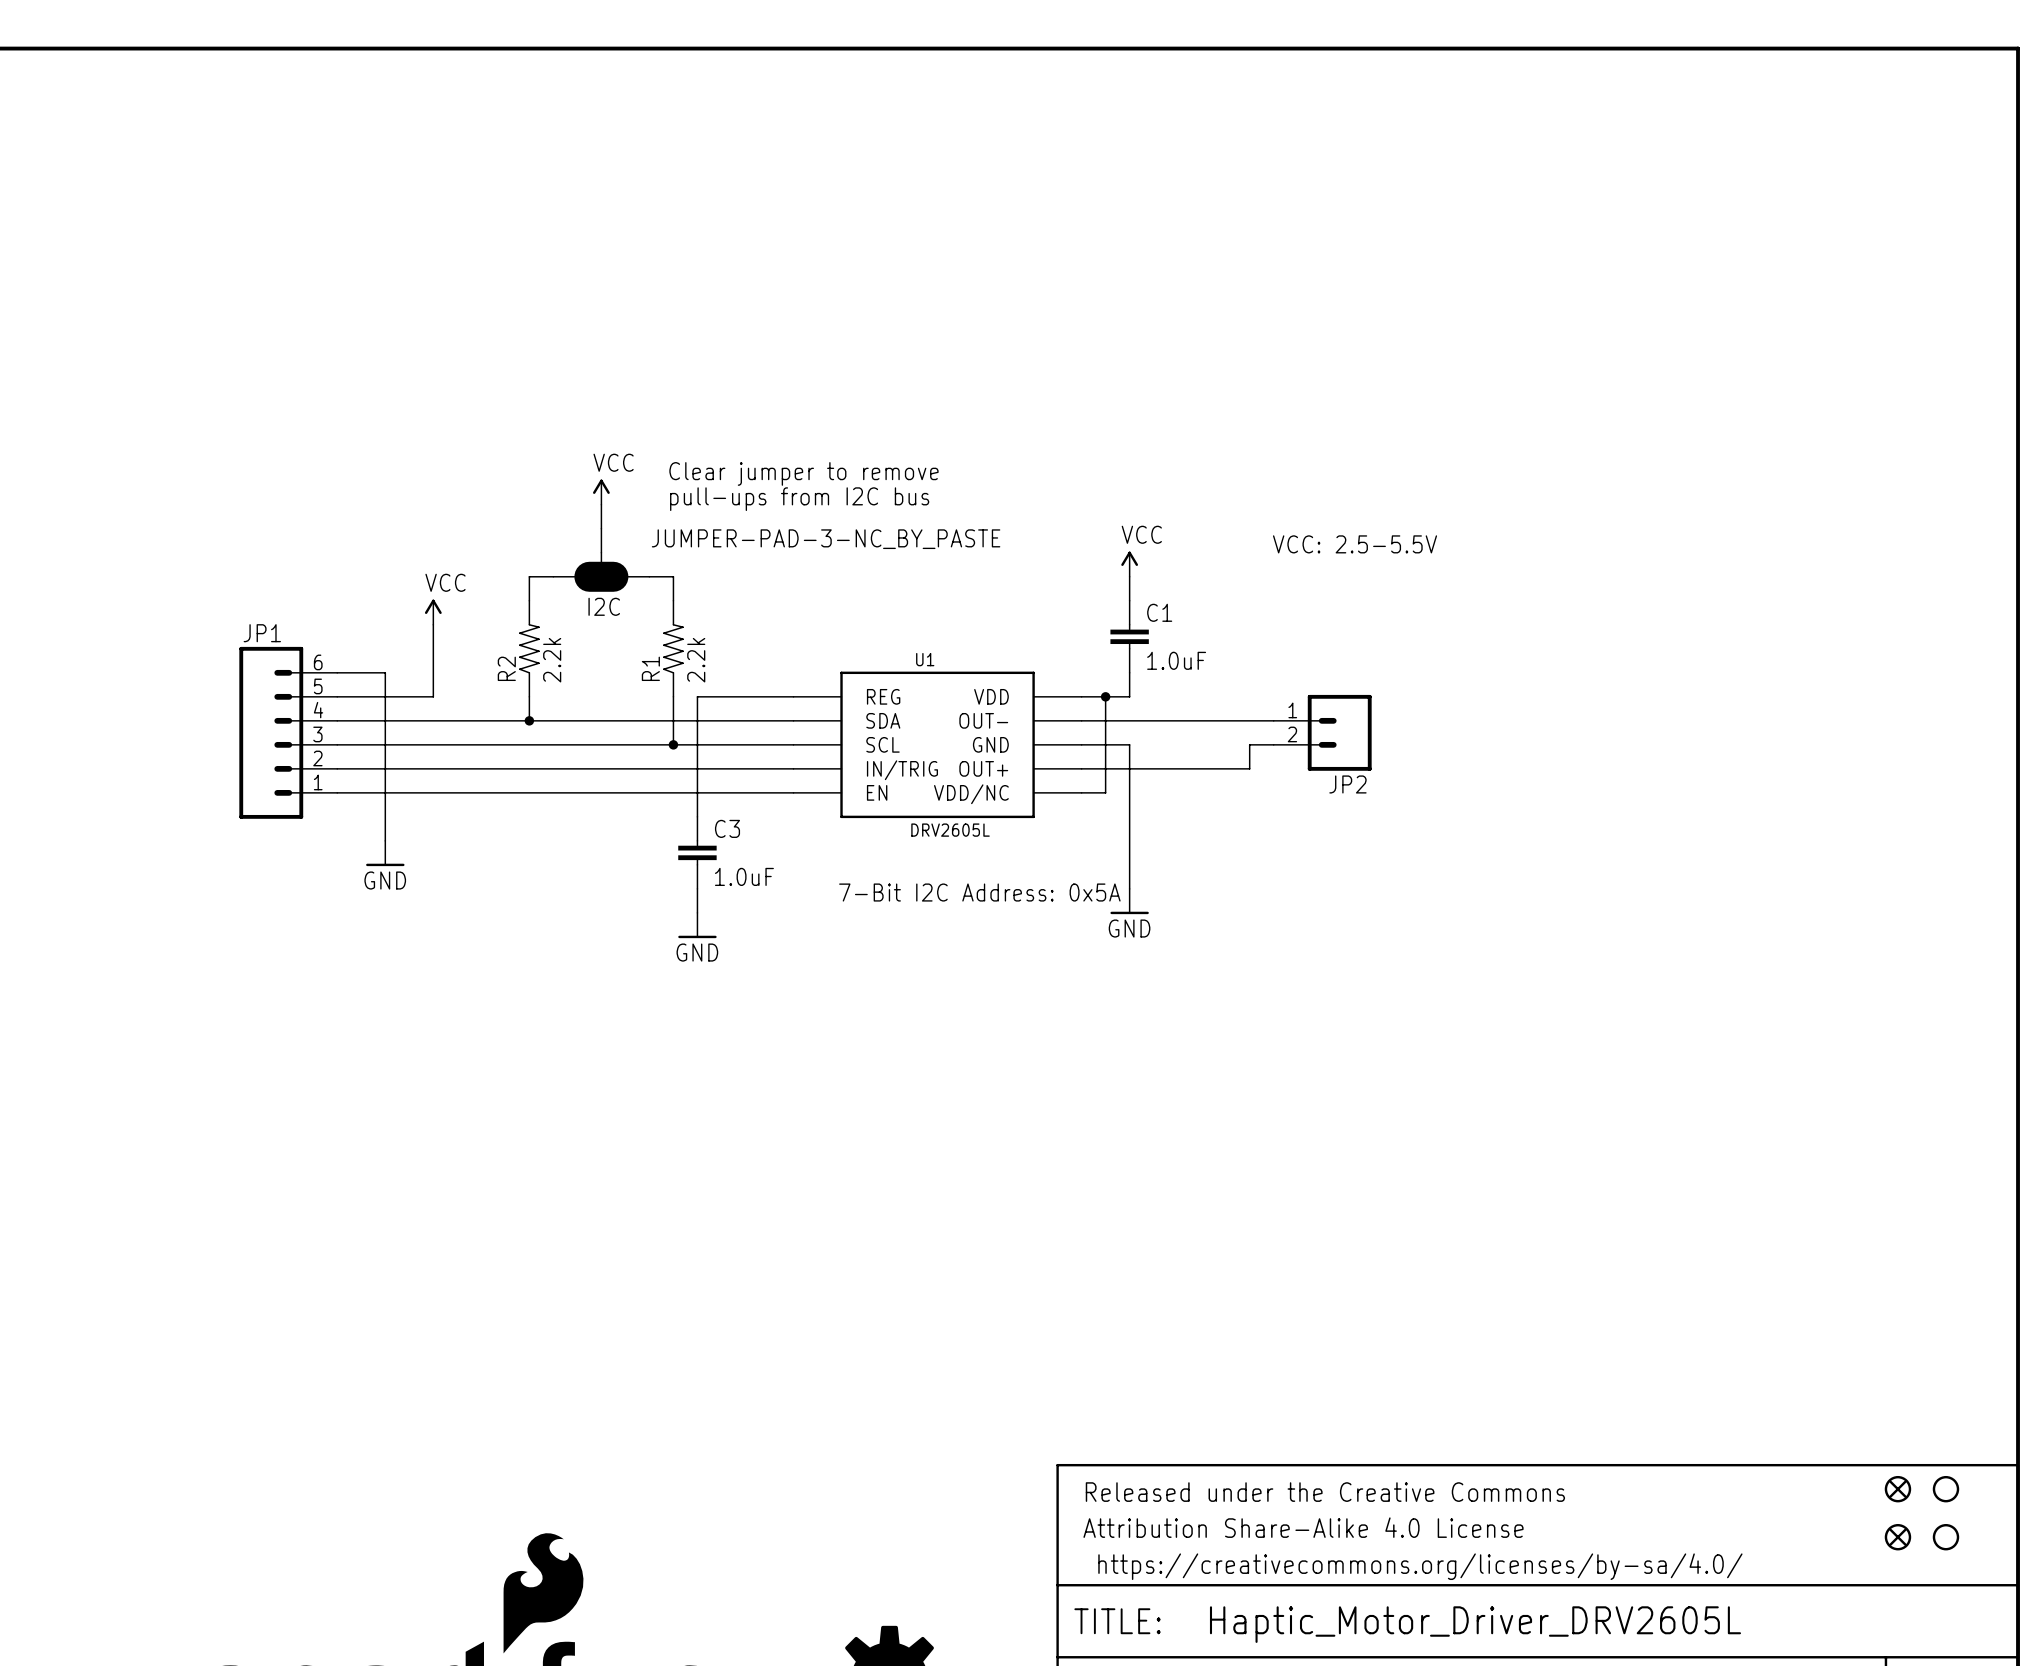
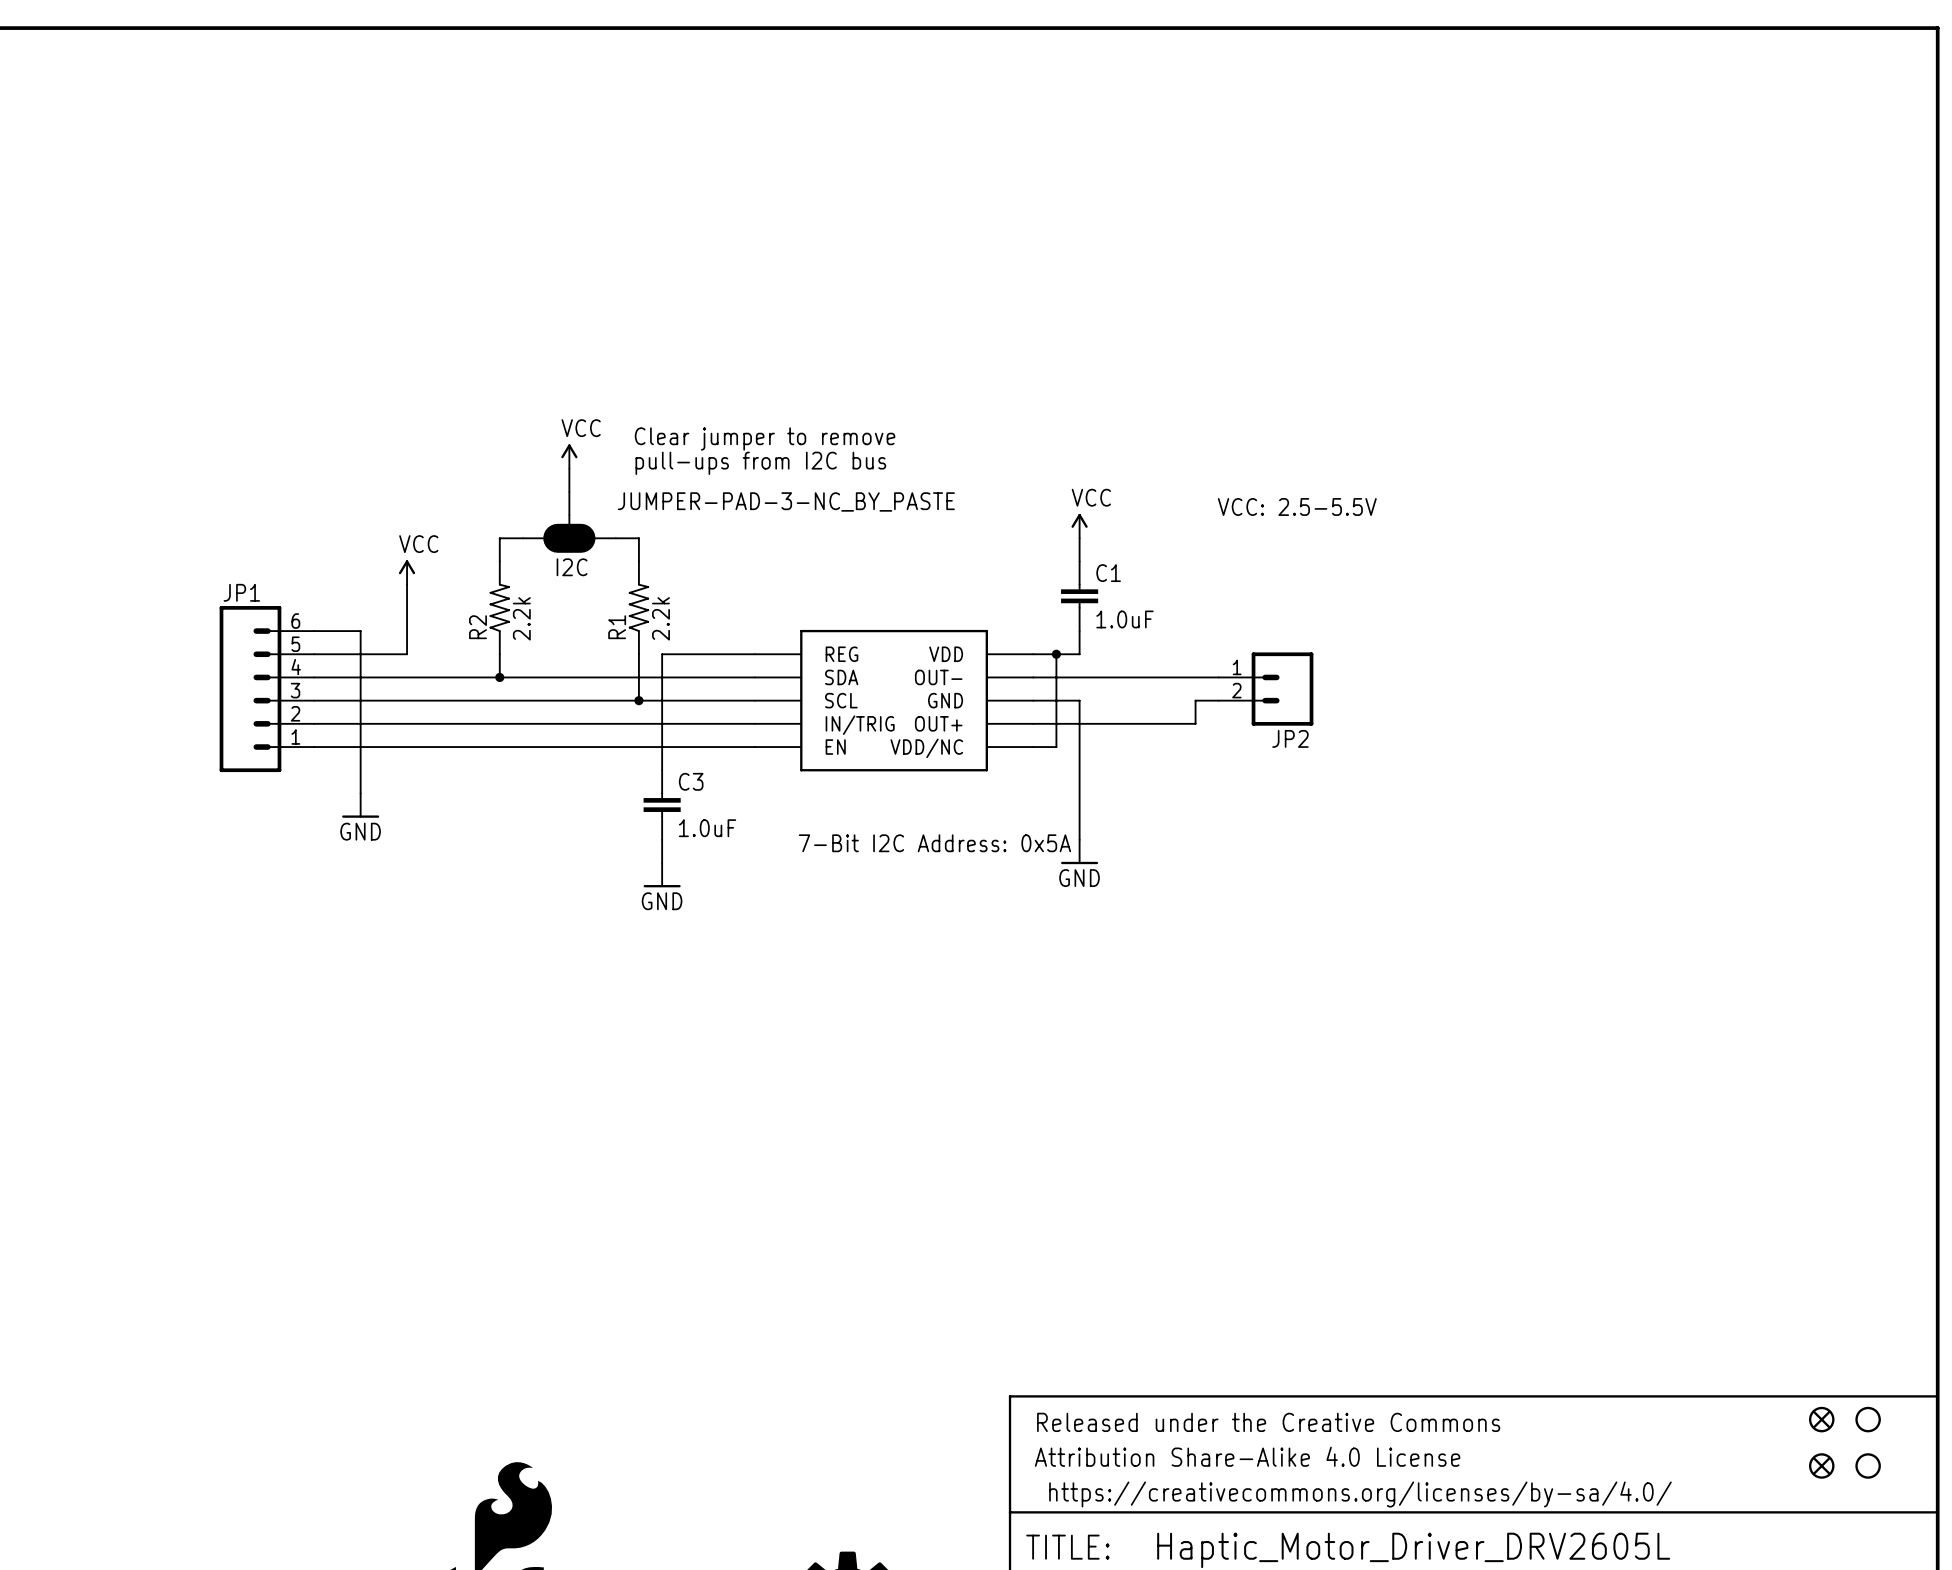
U1 name: U1 (925, 659) -> none
U1 value: DRV2605L (950, 830) -> none

